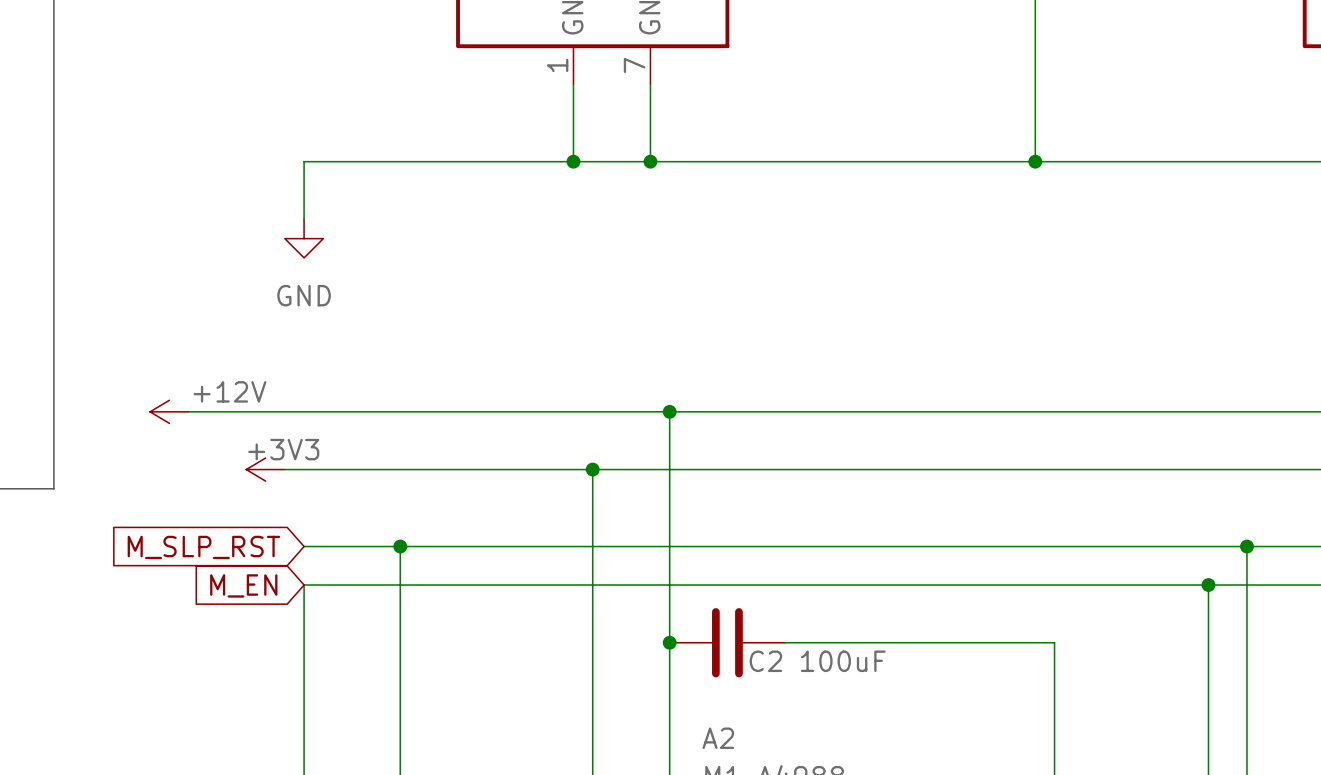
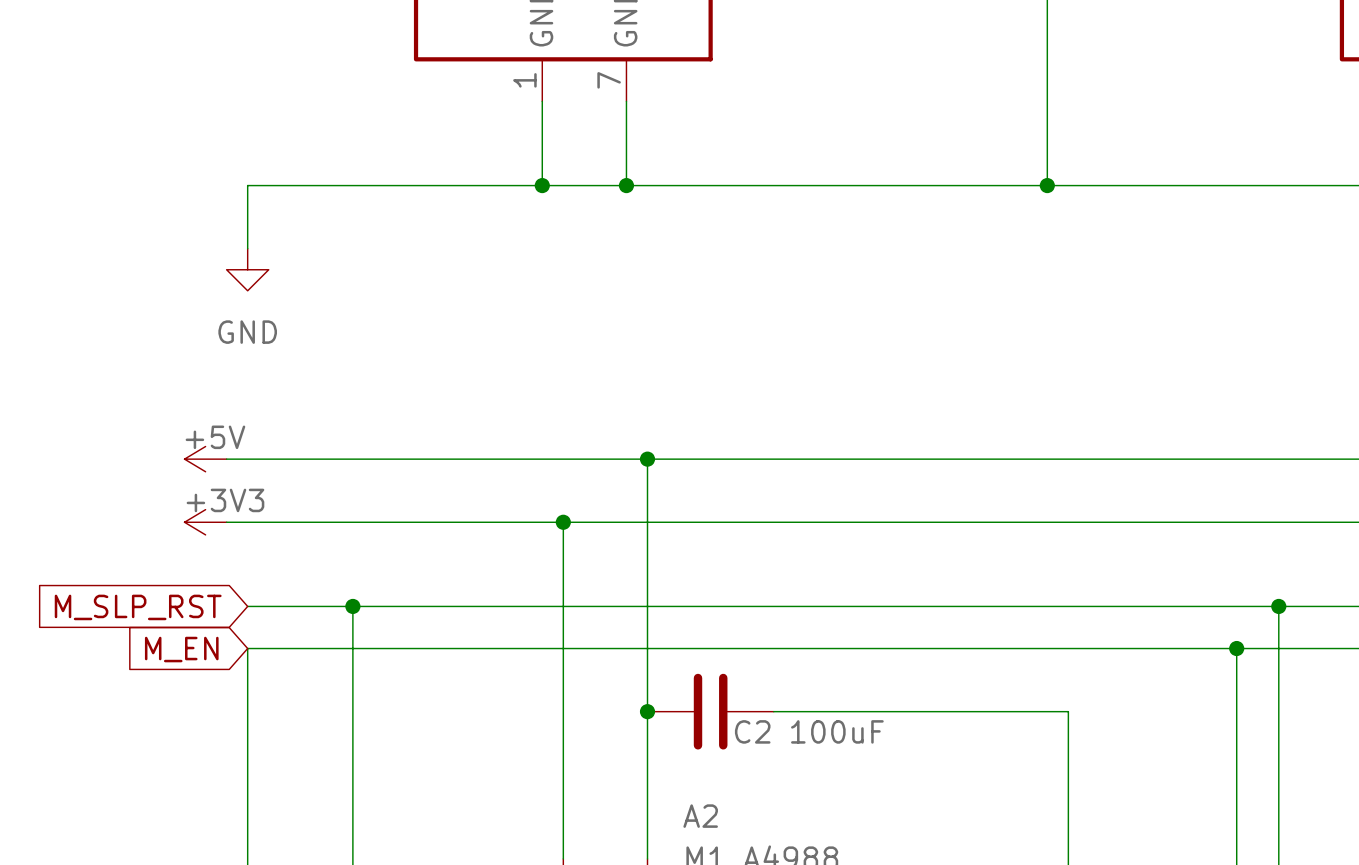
power symbol: +12V (169, 411) -> none
wire: (188, 411) (284, 411) -> none
power symbol: none -> +5V (205, 459)

